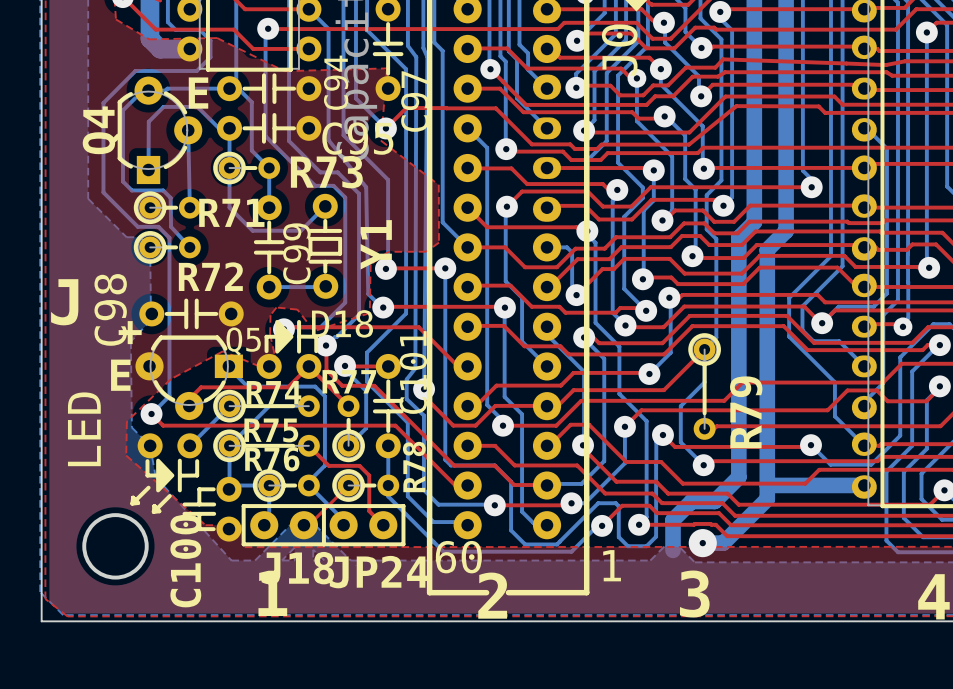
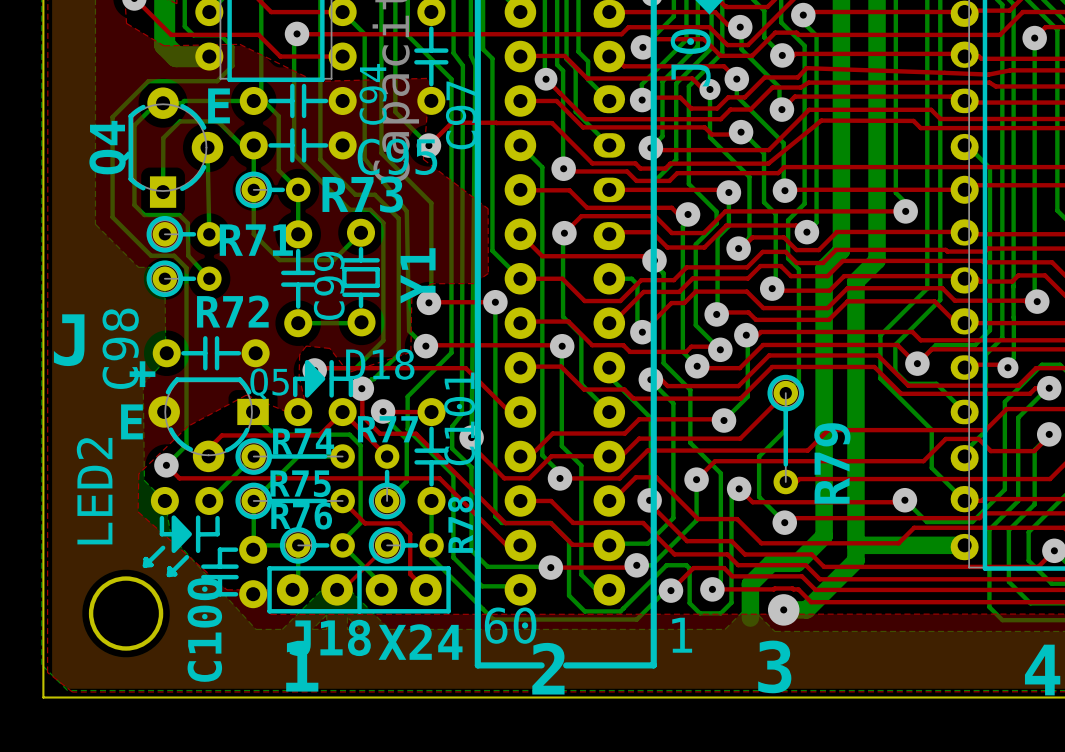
LED2 value: LED (84, 429) -> none
LED2 name: none -> LED2 (94, 491)
JP24 name: JP24 (379, 572) -> X24 (420, 642)

